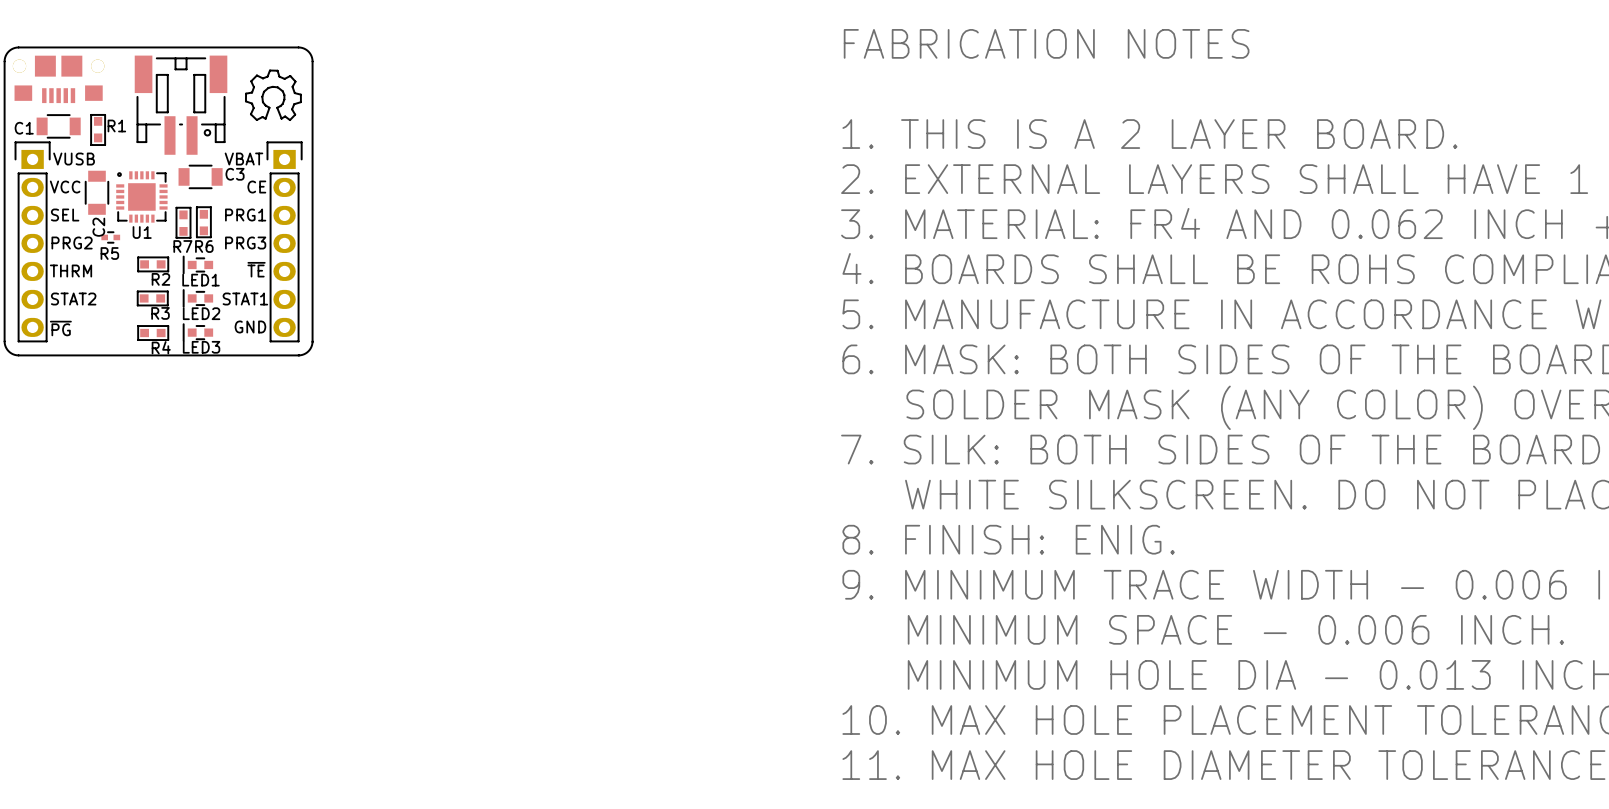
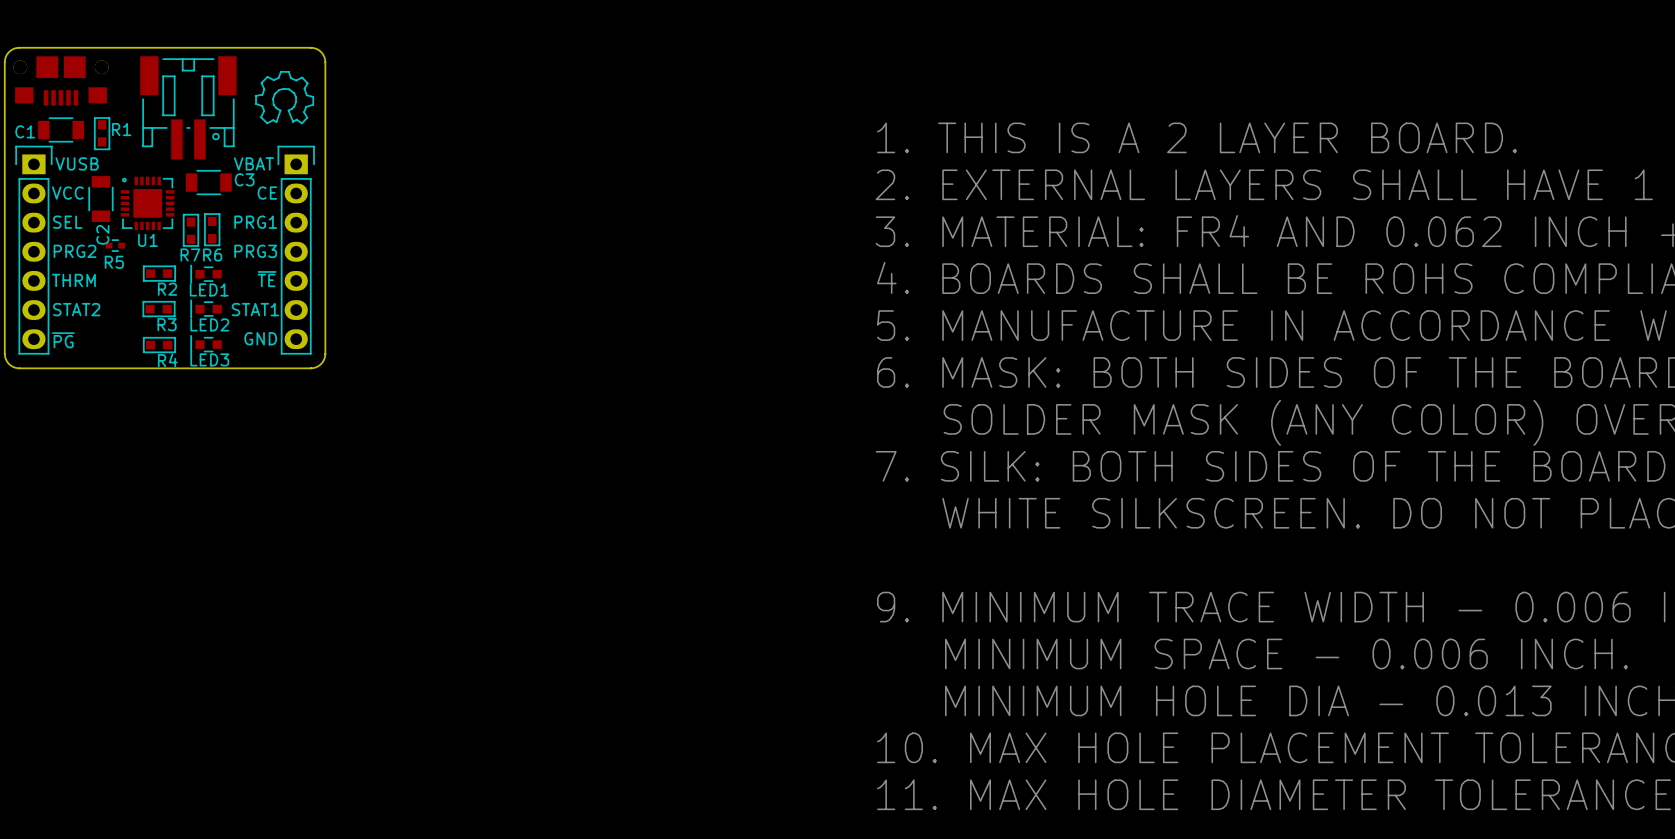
text: FABRICATION NOTES (1046, 43) -> none
text: 8. FINISH: ENIG. (1008, 539) -> none

